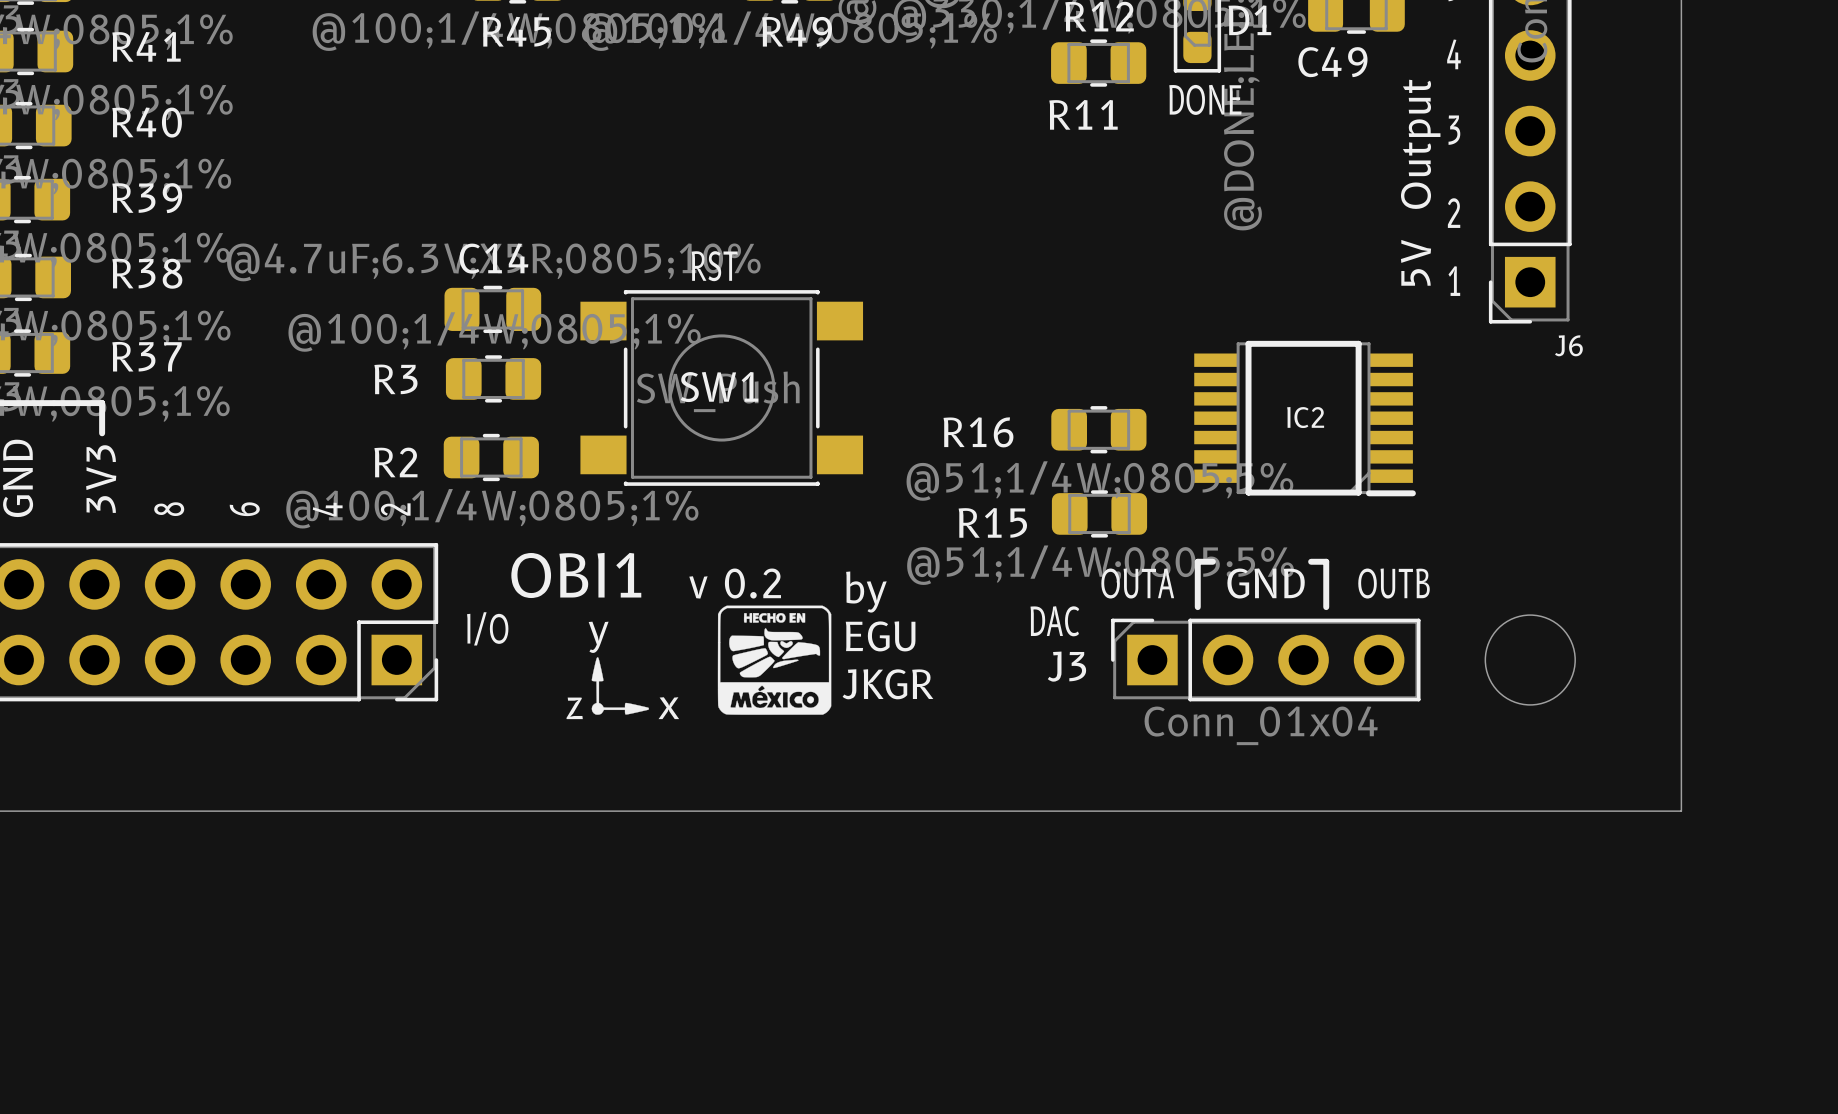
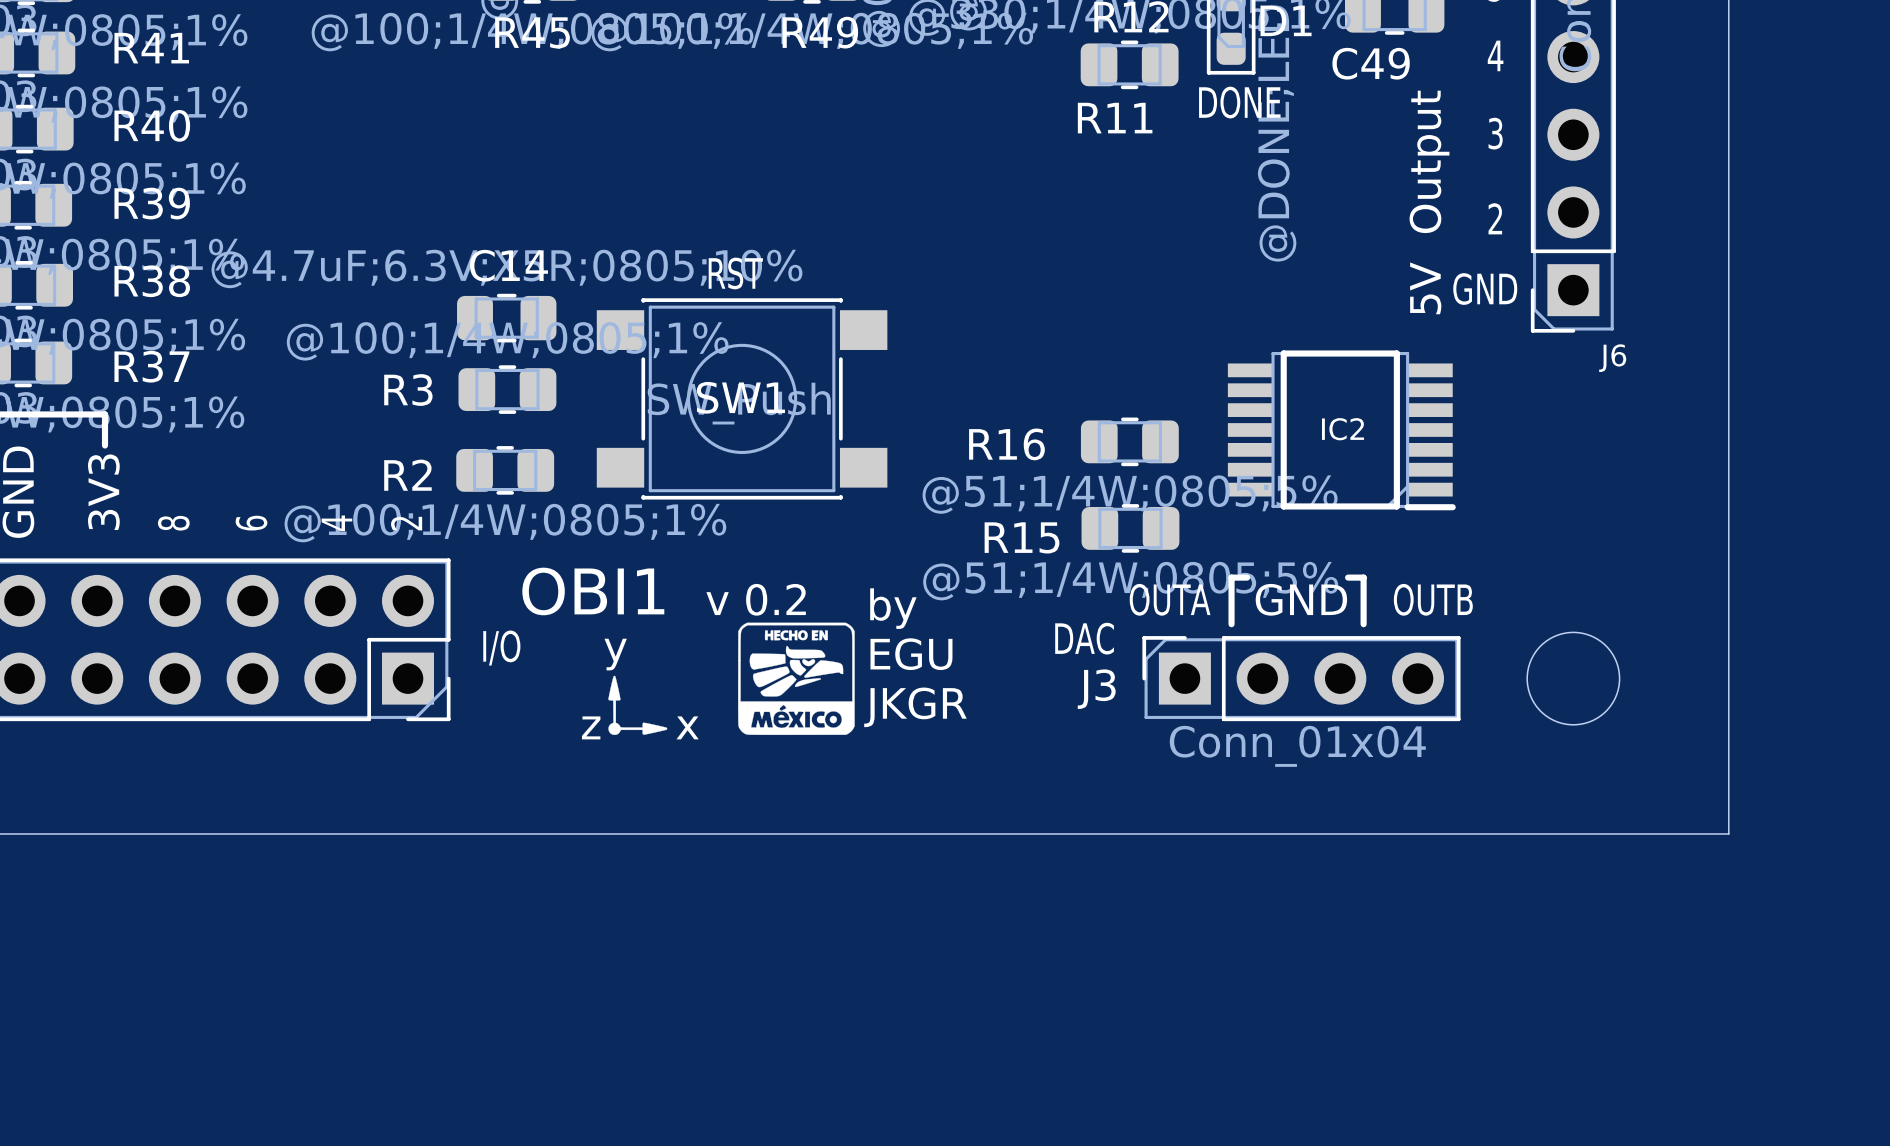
text position: 5V Output (1420, 182) -> 5V Output (1429, 202)
text: 1 (1454, 281) -> GND (1485, 289)

